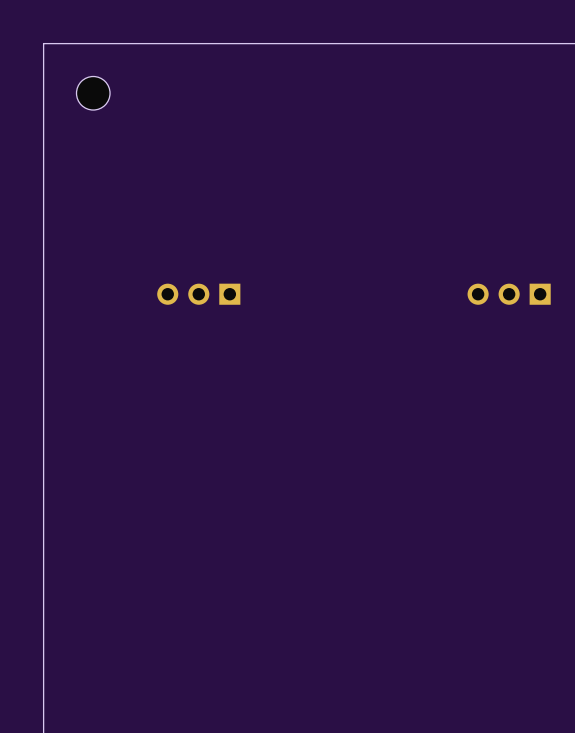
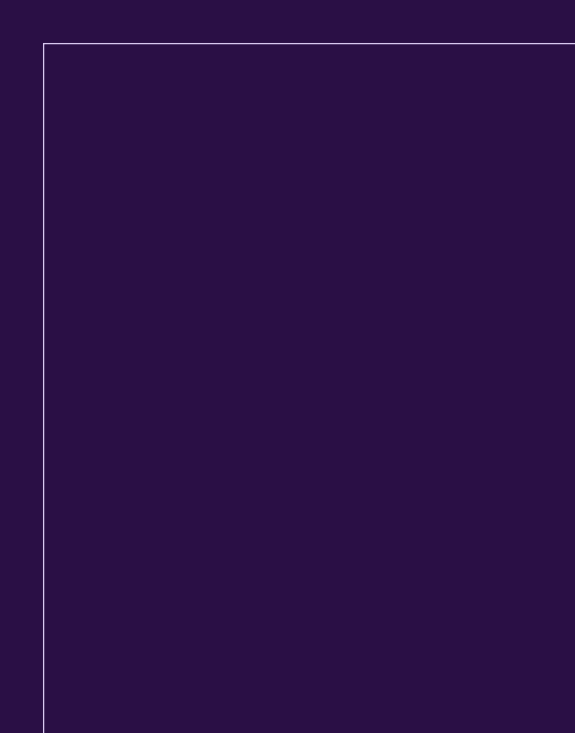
part: (93, 93) -> none
part: (198, 294) -> none
part: (509, 294) -> none

